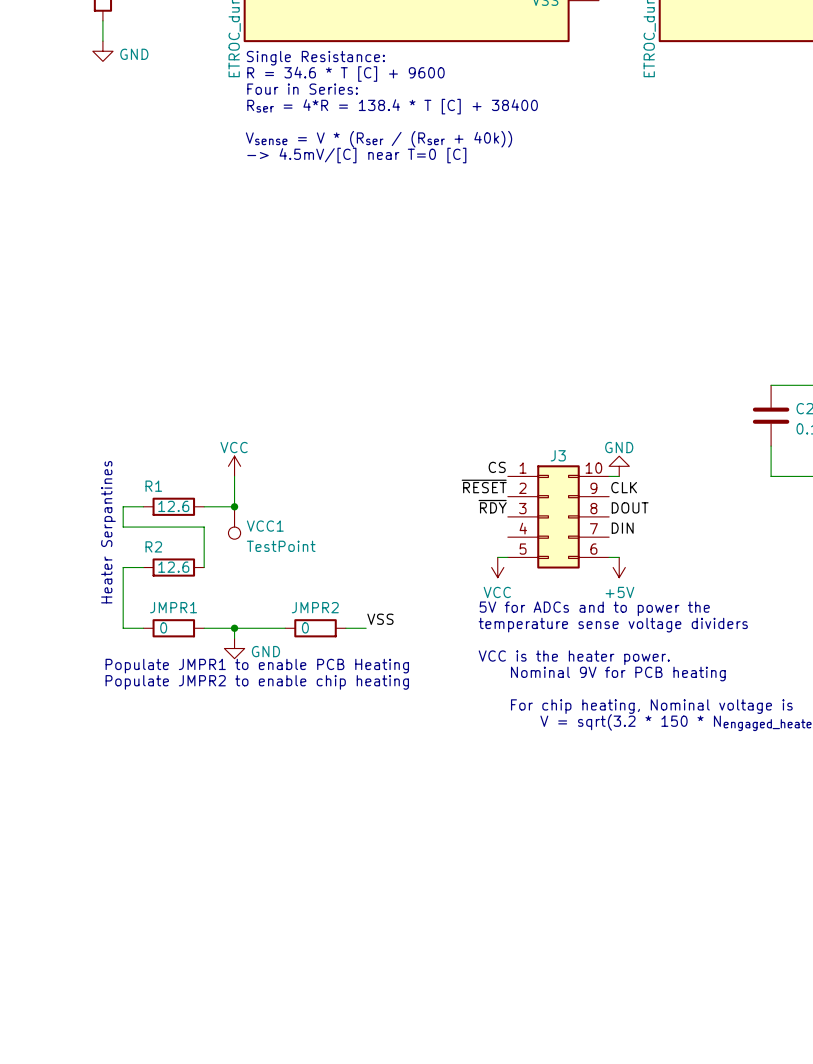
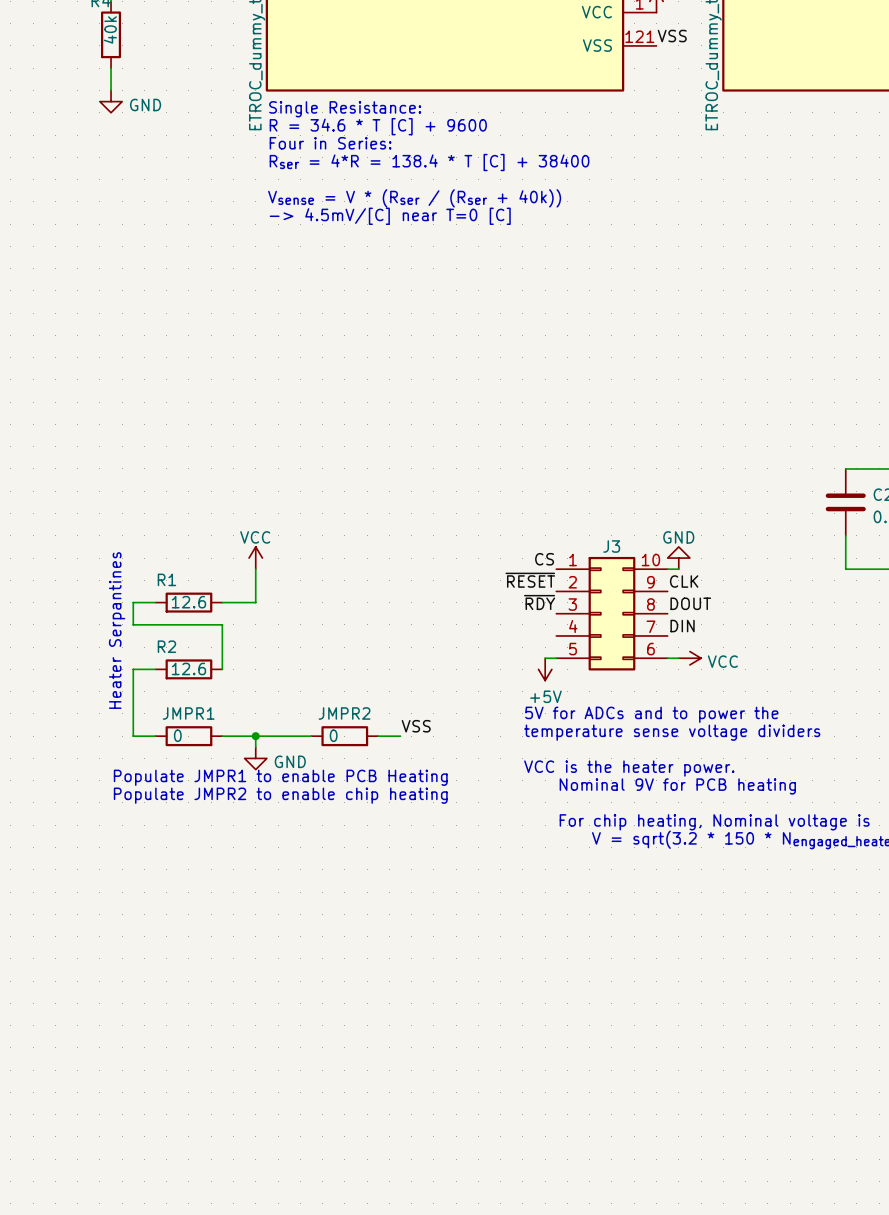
junction: (234, 506) -> none
VCC1: TestPoint (234, 522) -> none
power symbol: none -> VCC (689, 658)
power symbol: VCC (497, 567) -> +5V (545, 669)
power symbol: +5V (619, 567) -> none

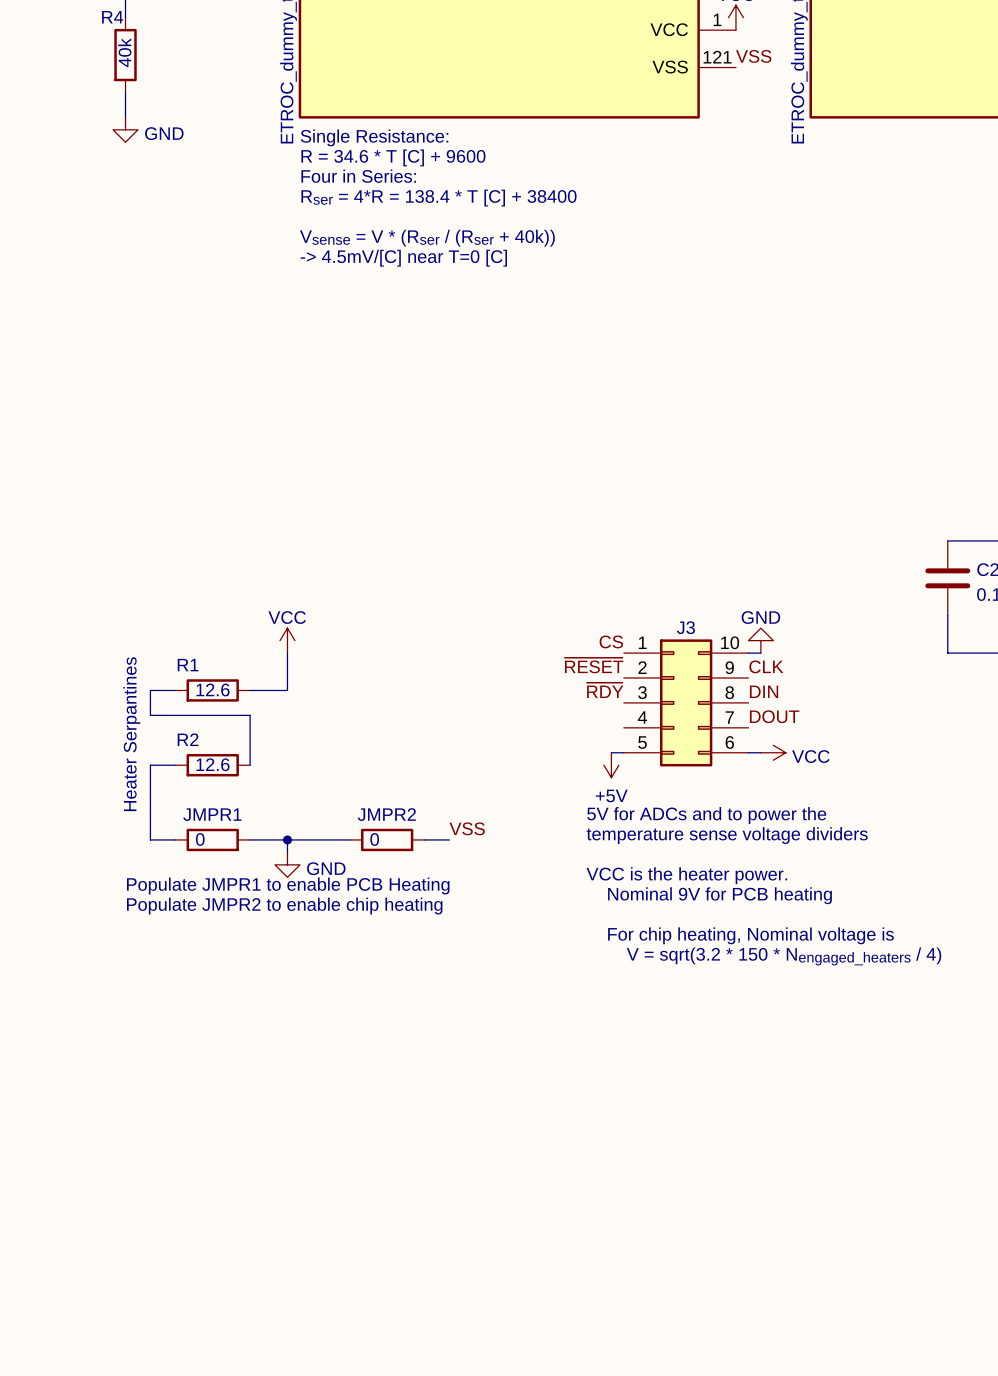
label: DOUT (690, 603) -> DIN (764, 691)
label: DIN (682, 626) -> DOUT (774, 716)

